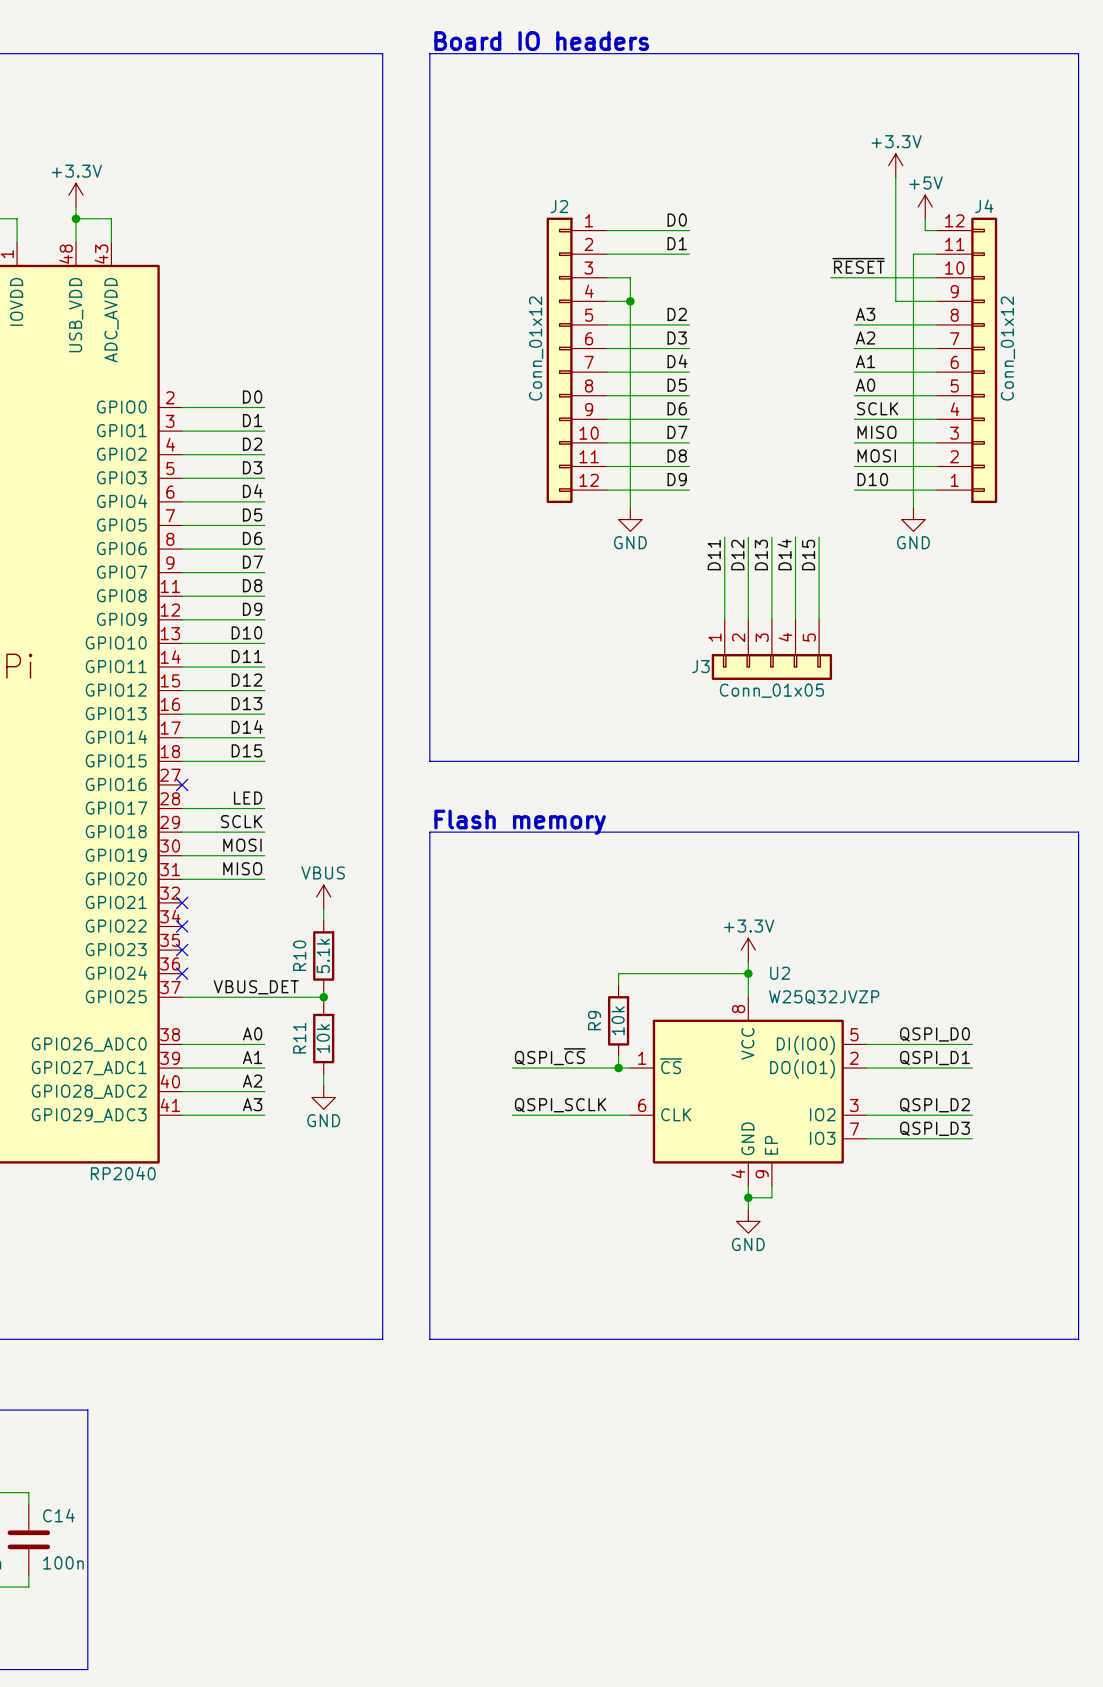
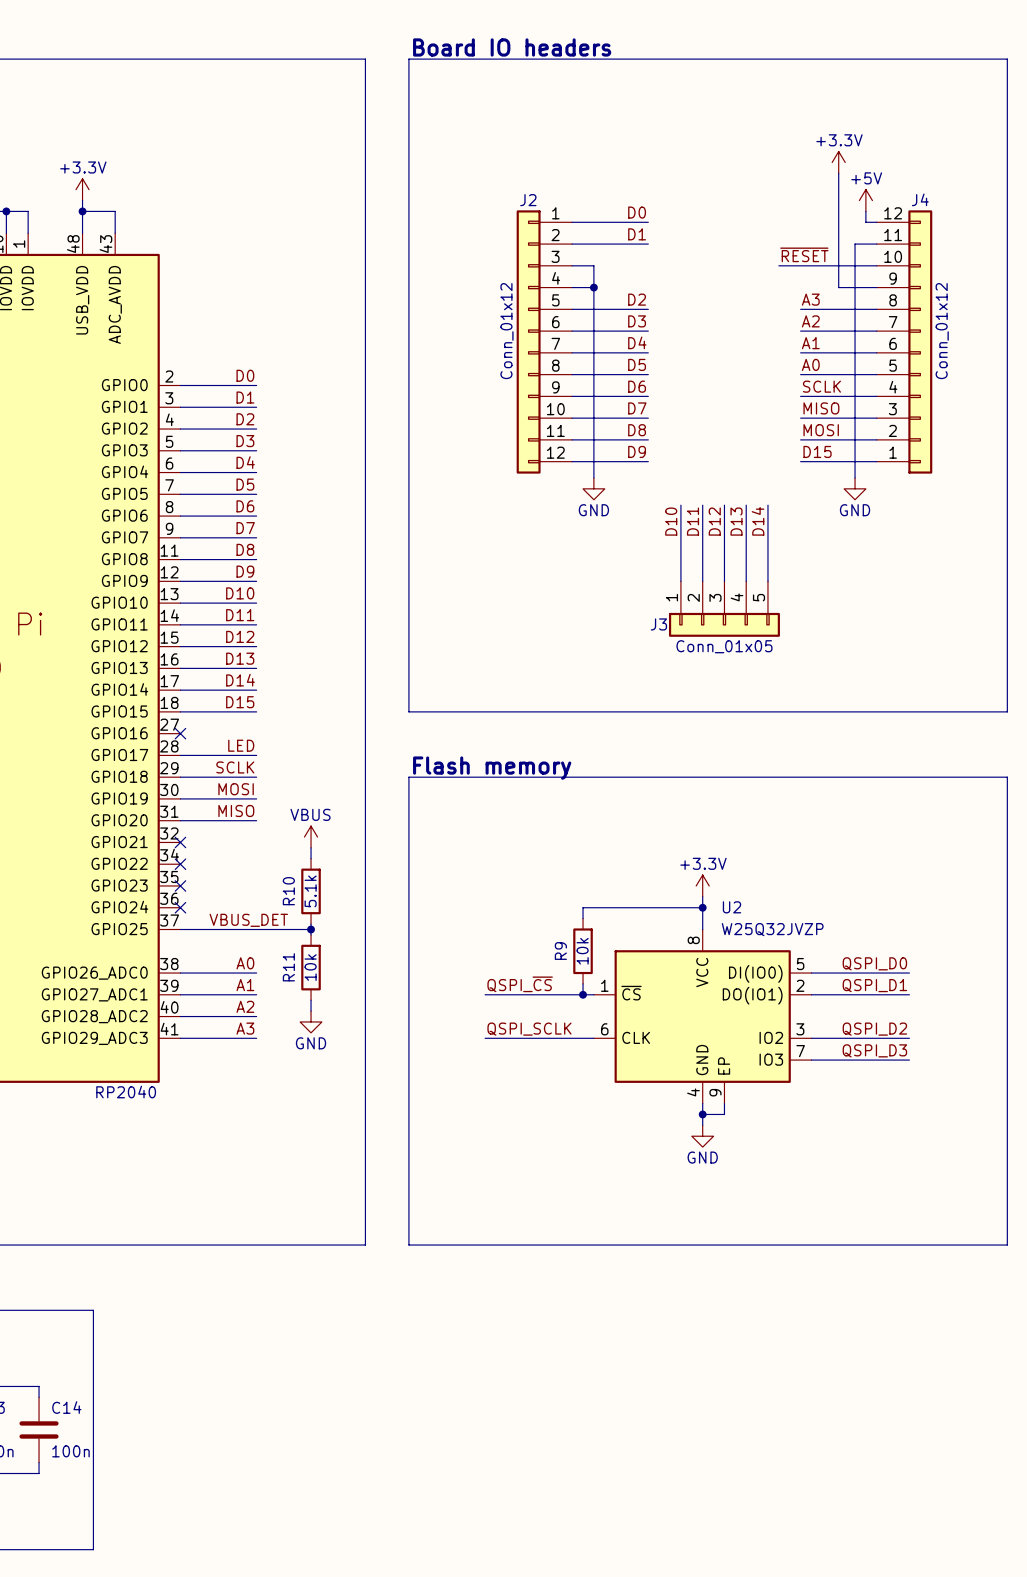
label: D10 (872, 479) -> D15 (817, 451)
label: D14 (784, 554) -> D13 (736, 521)
label: D11 (714, 555) -> D10 (671, 521)
label: D12 (737, 555) -> D11 (692, 521)
label: D13 (761, 555) -> D12 (714, 521)
label: D15 (808, 555) -> D14 (758, 521)

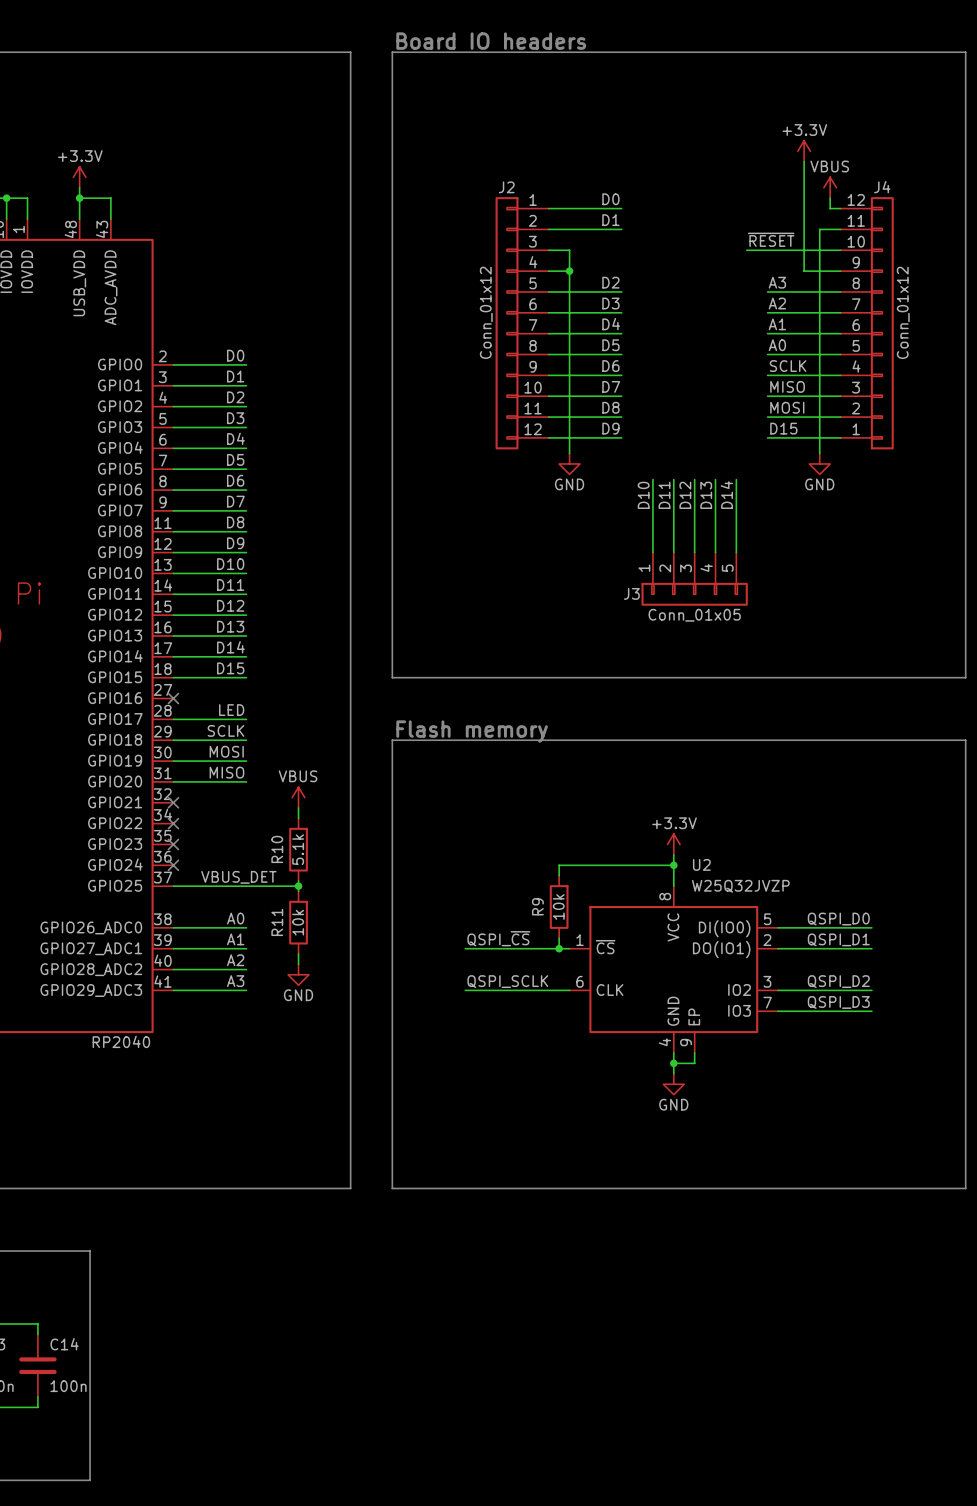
power symbol: +5V (865, 200) -> VBUS (830, 187)

